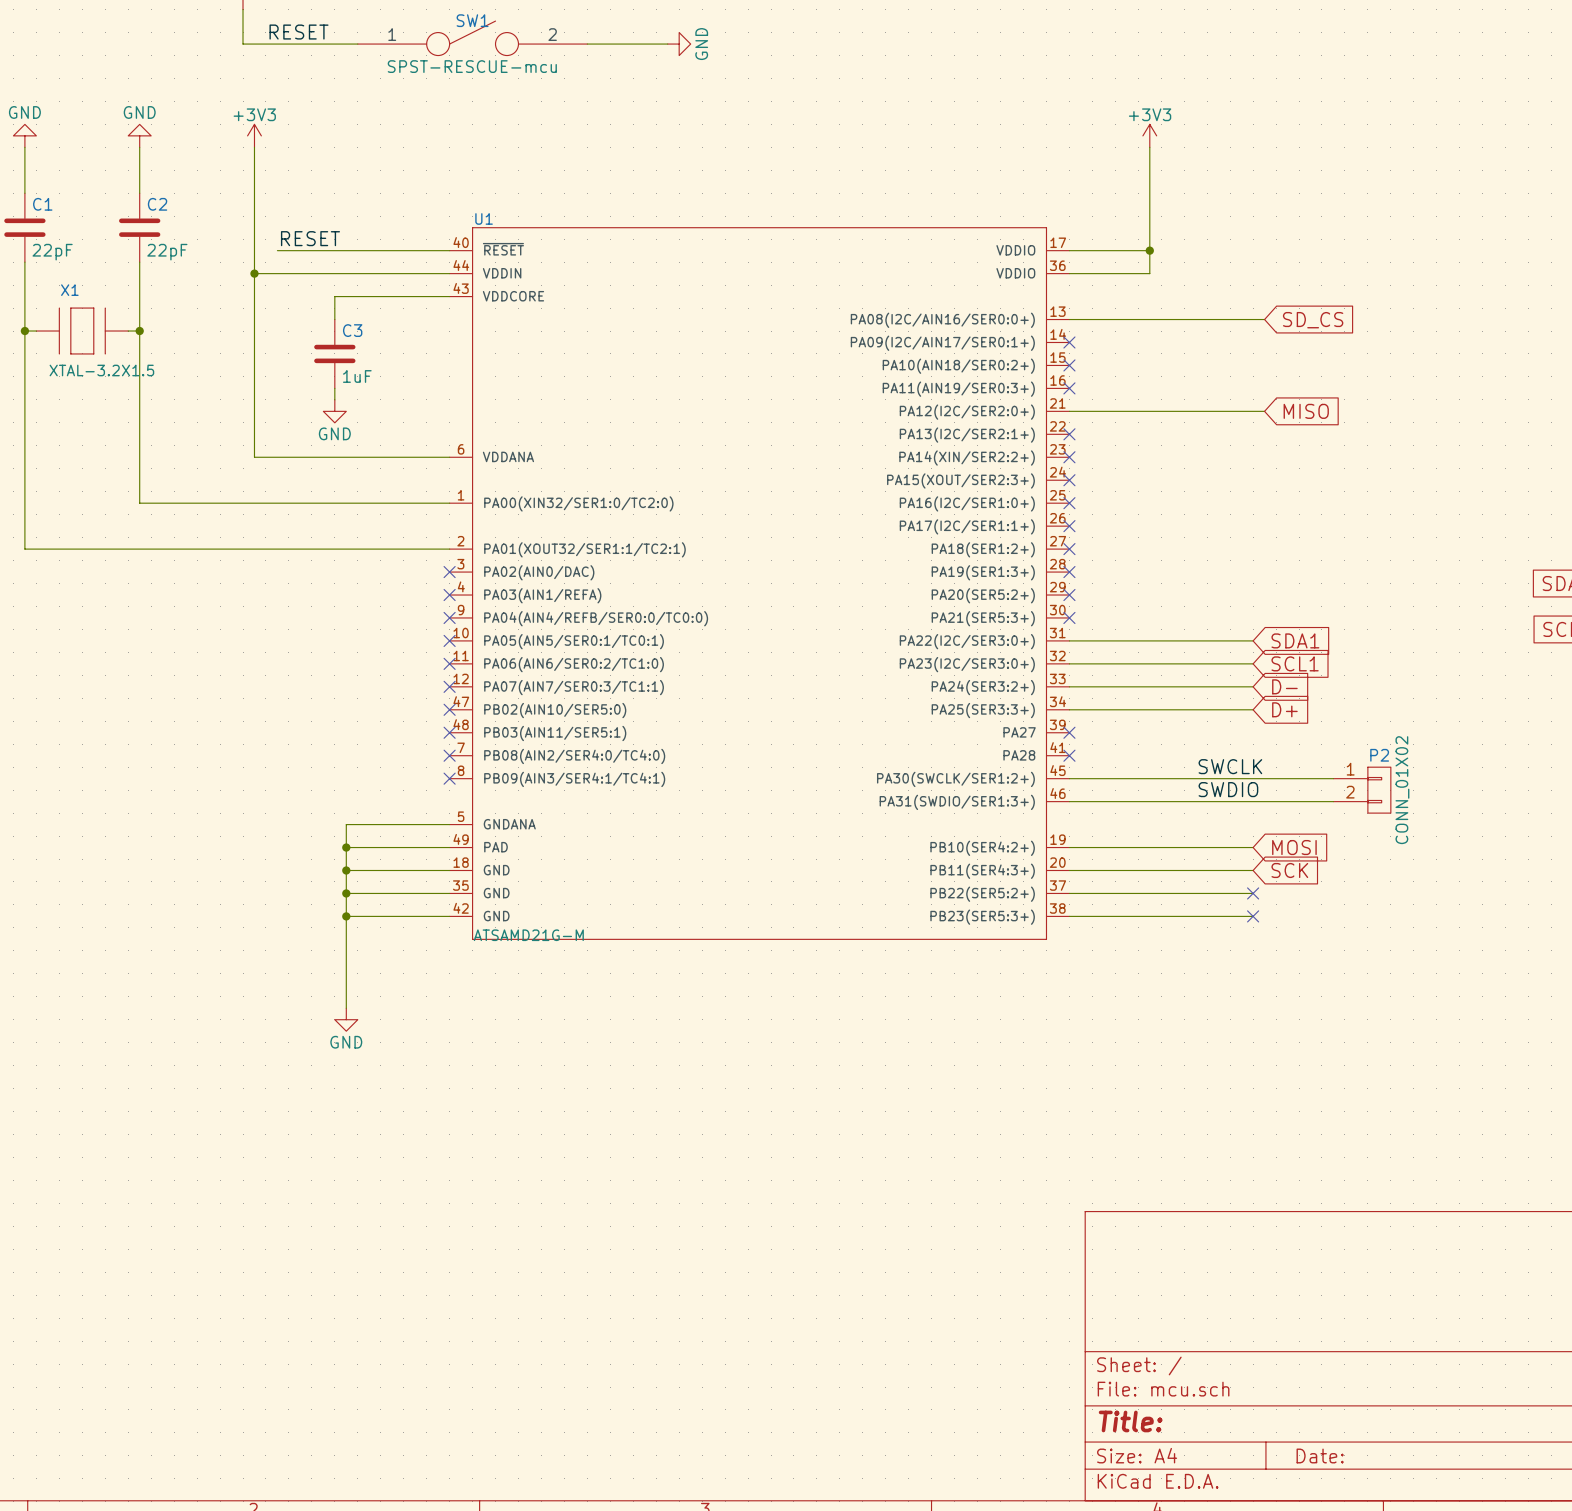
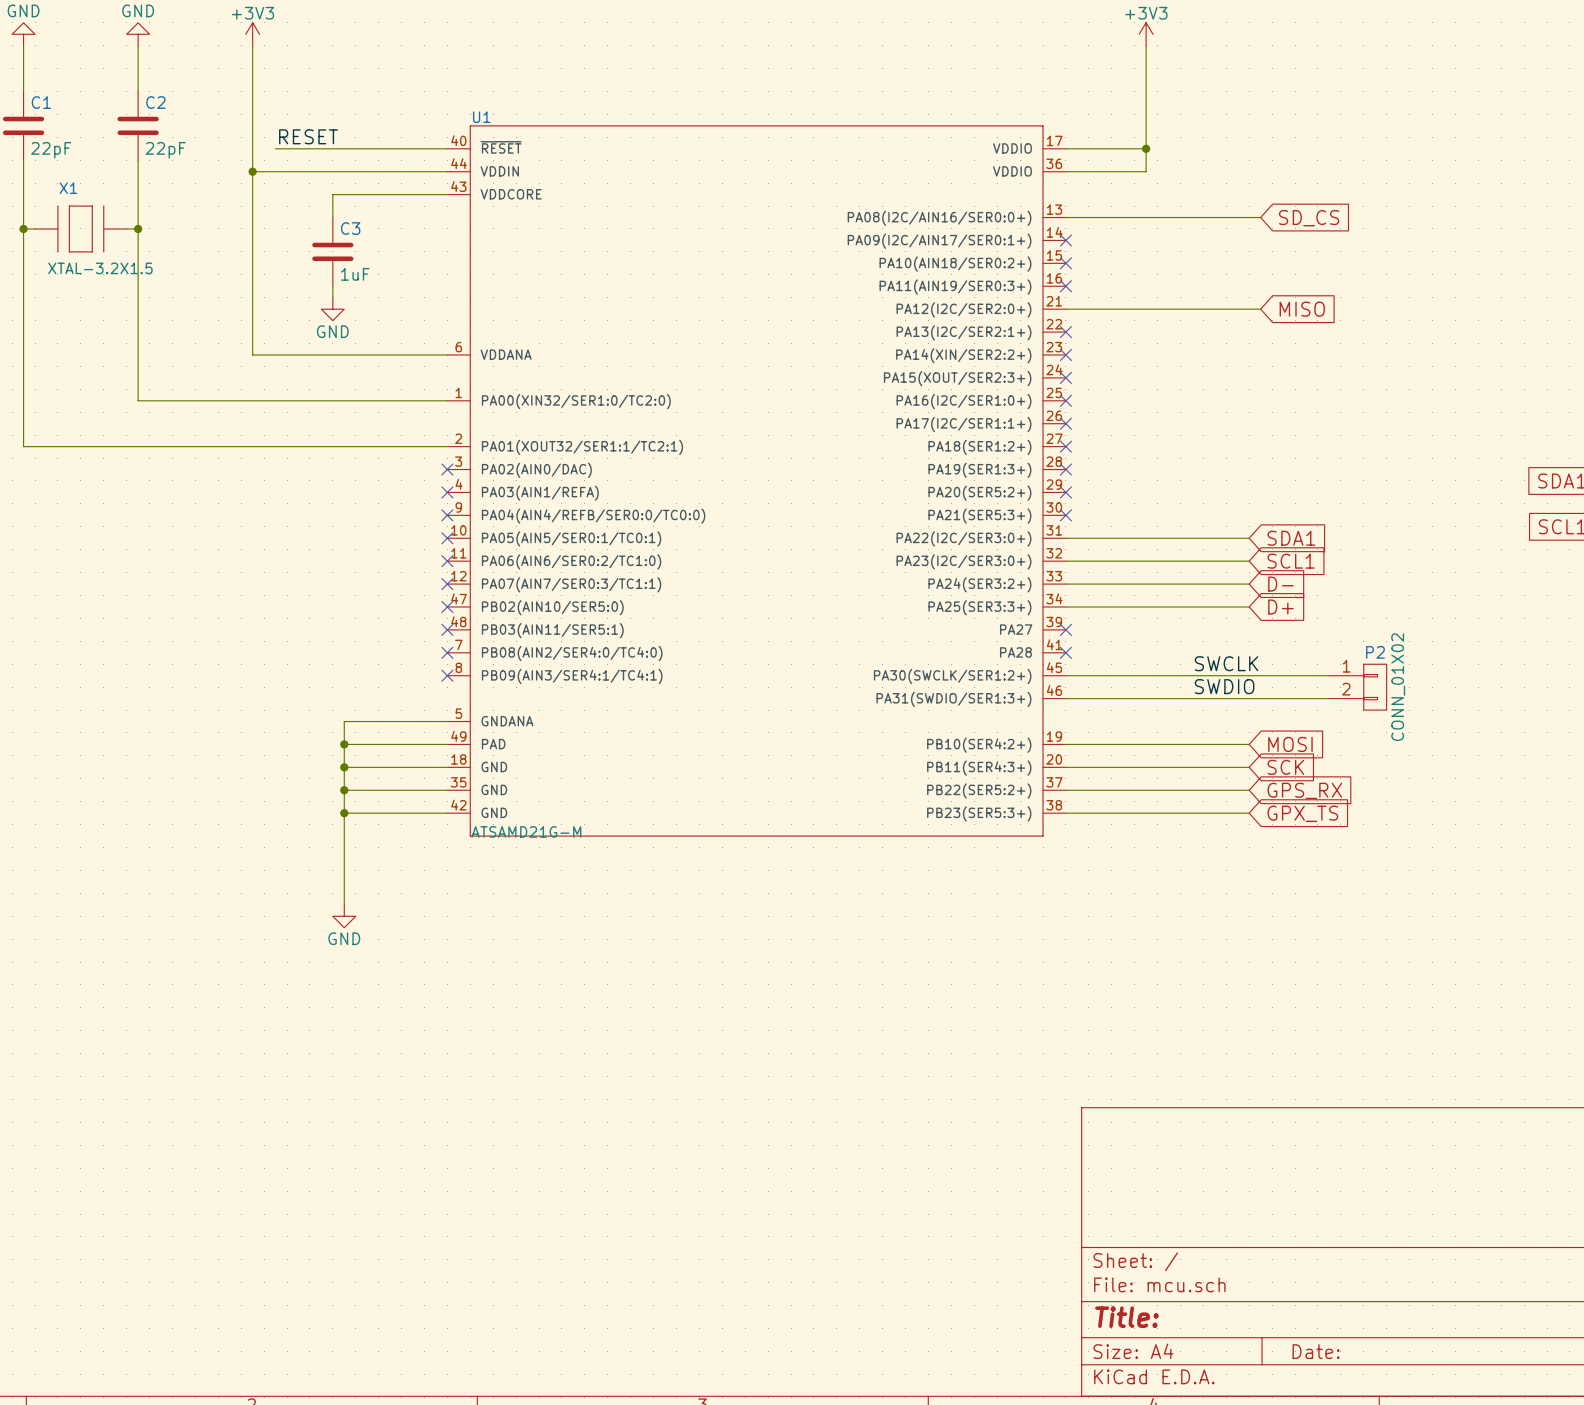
no-connect mark: (1253, 893) -> none
global label: none -> GPS_RX (1304, 790)
no-connect mark: (1253, 916) -> none
global label: none -> GPX_TS (1302, 813)

